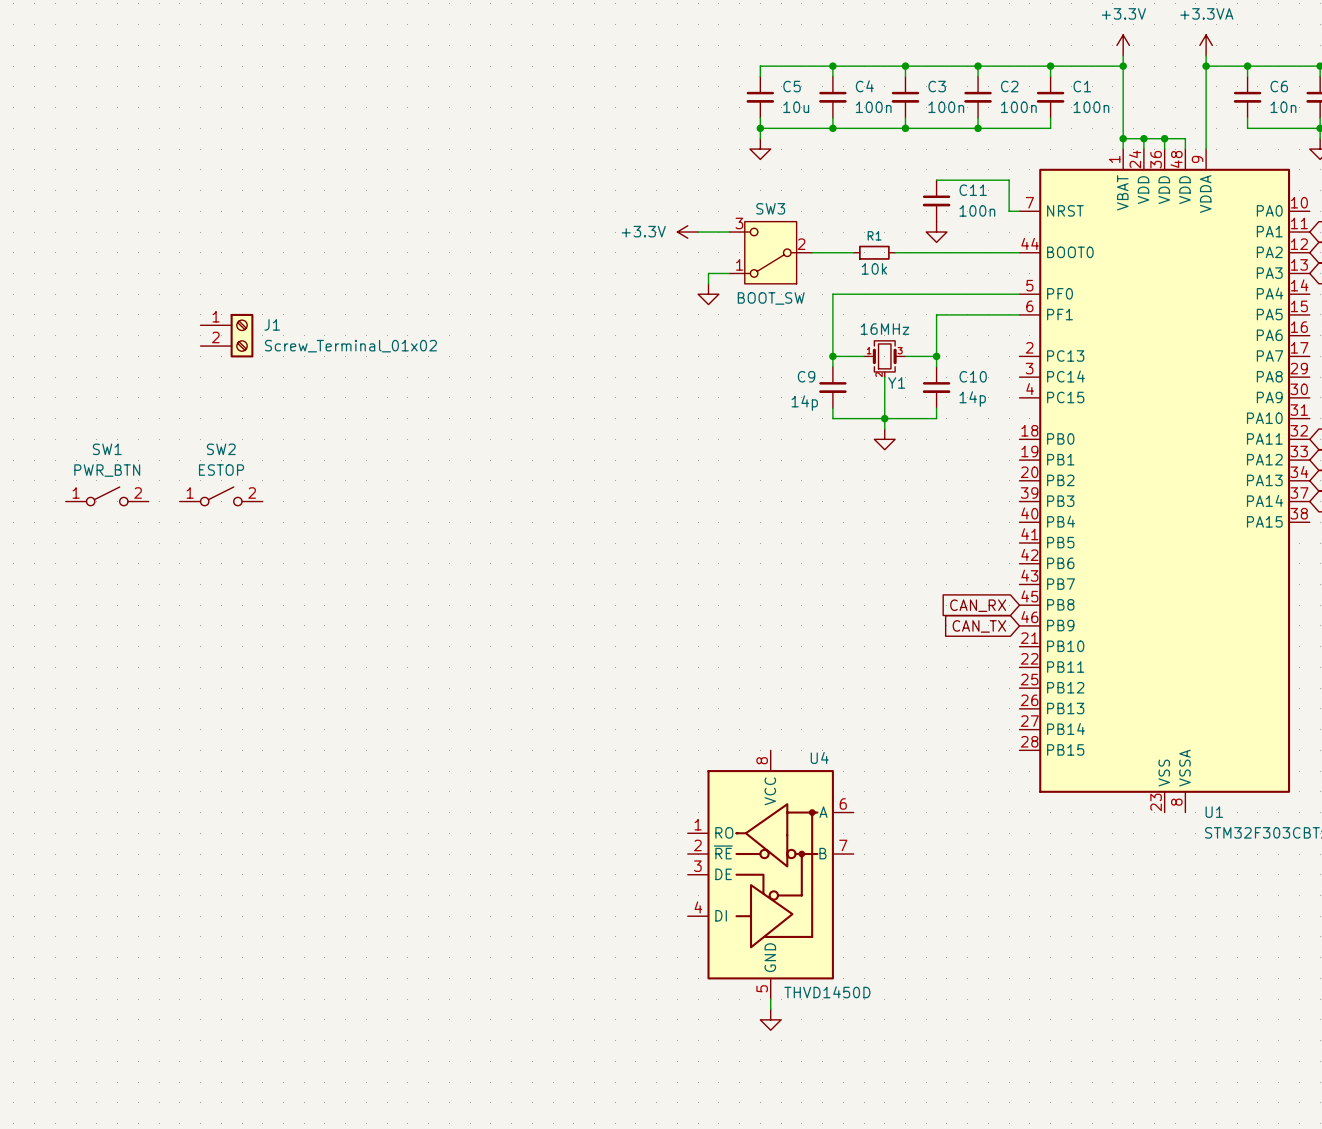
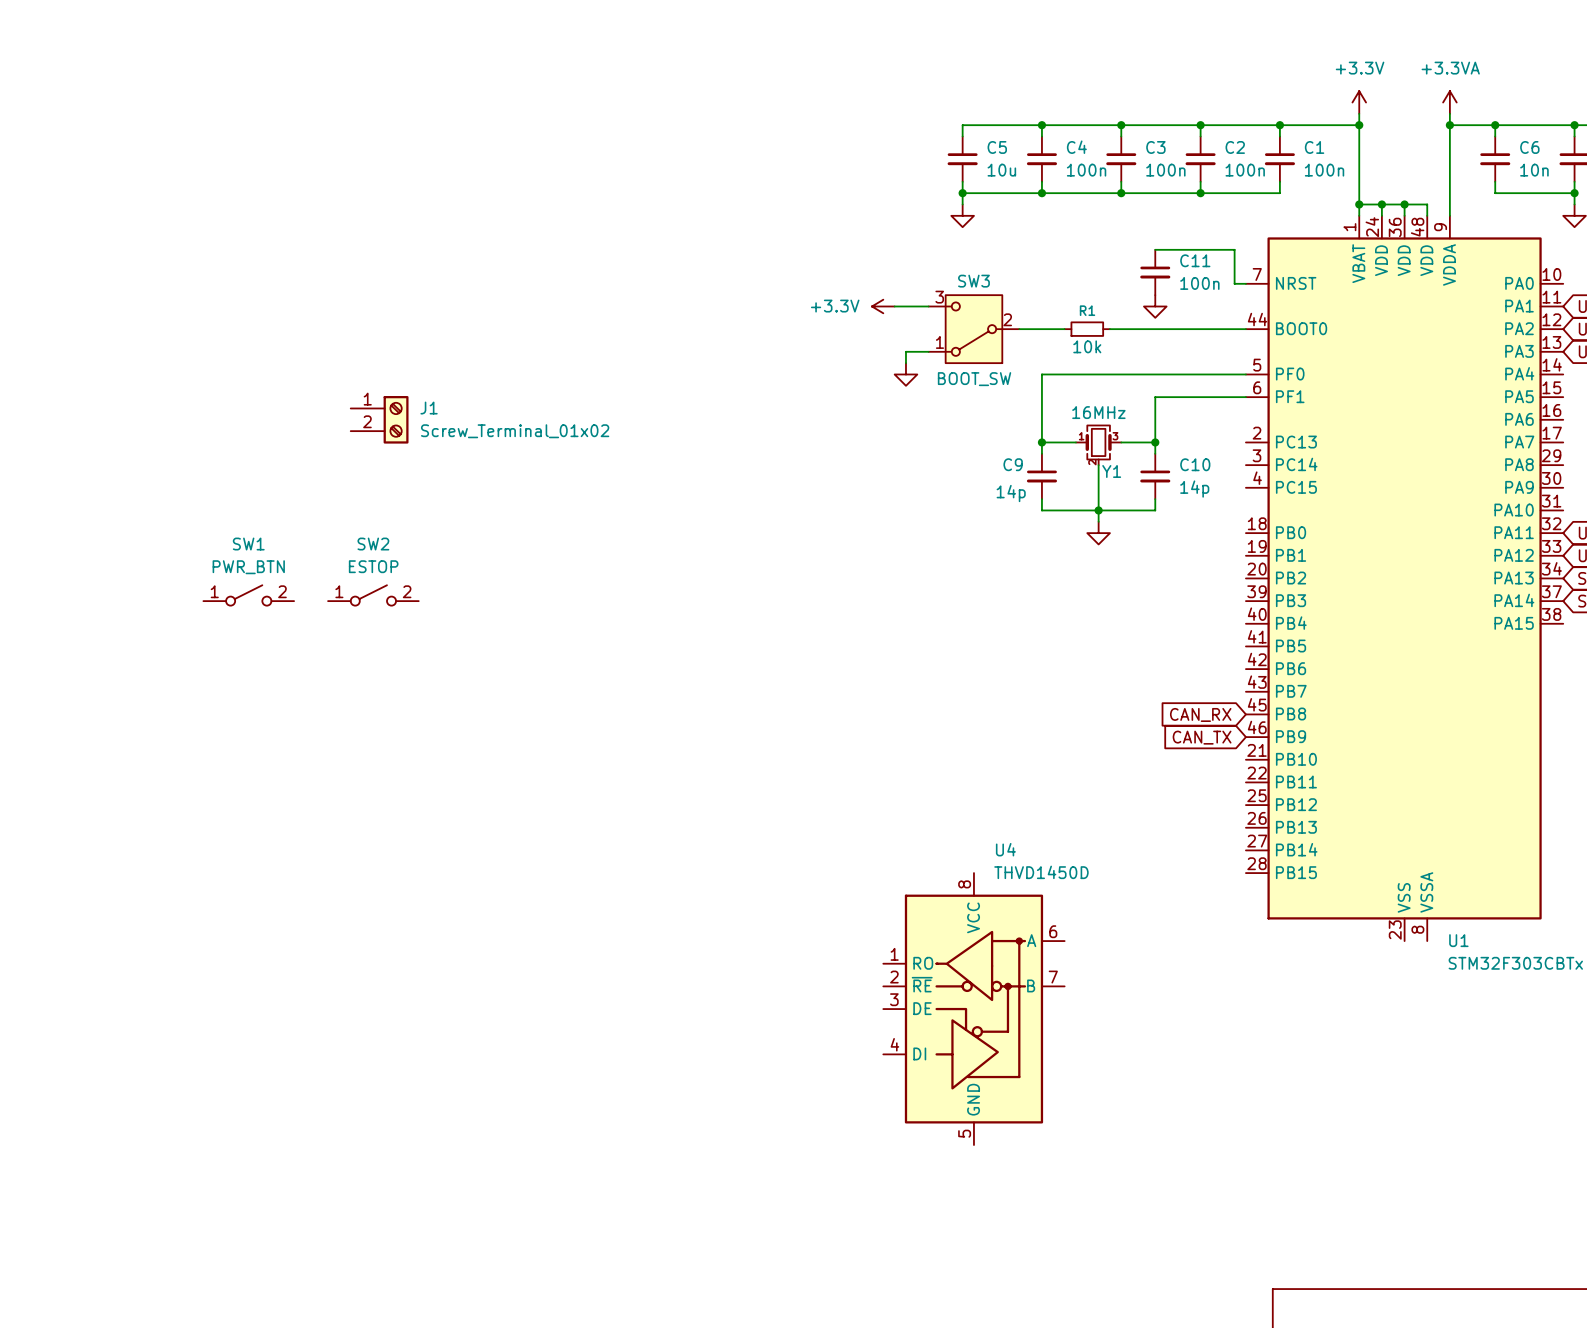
U4 name position: U4 (819, 757) -> U4 (1005, 849)
U4 value position: THVD1450D (827, 992) -> THVD1450D (1041, 872)
wire: (770, 999) (770, 1009) -> none
power symbol: (770, 1019) -> none

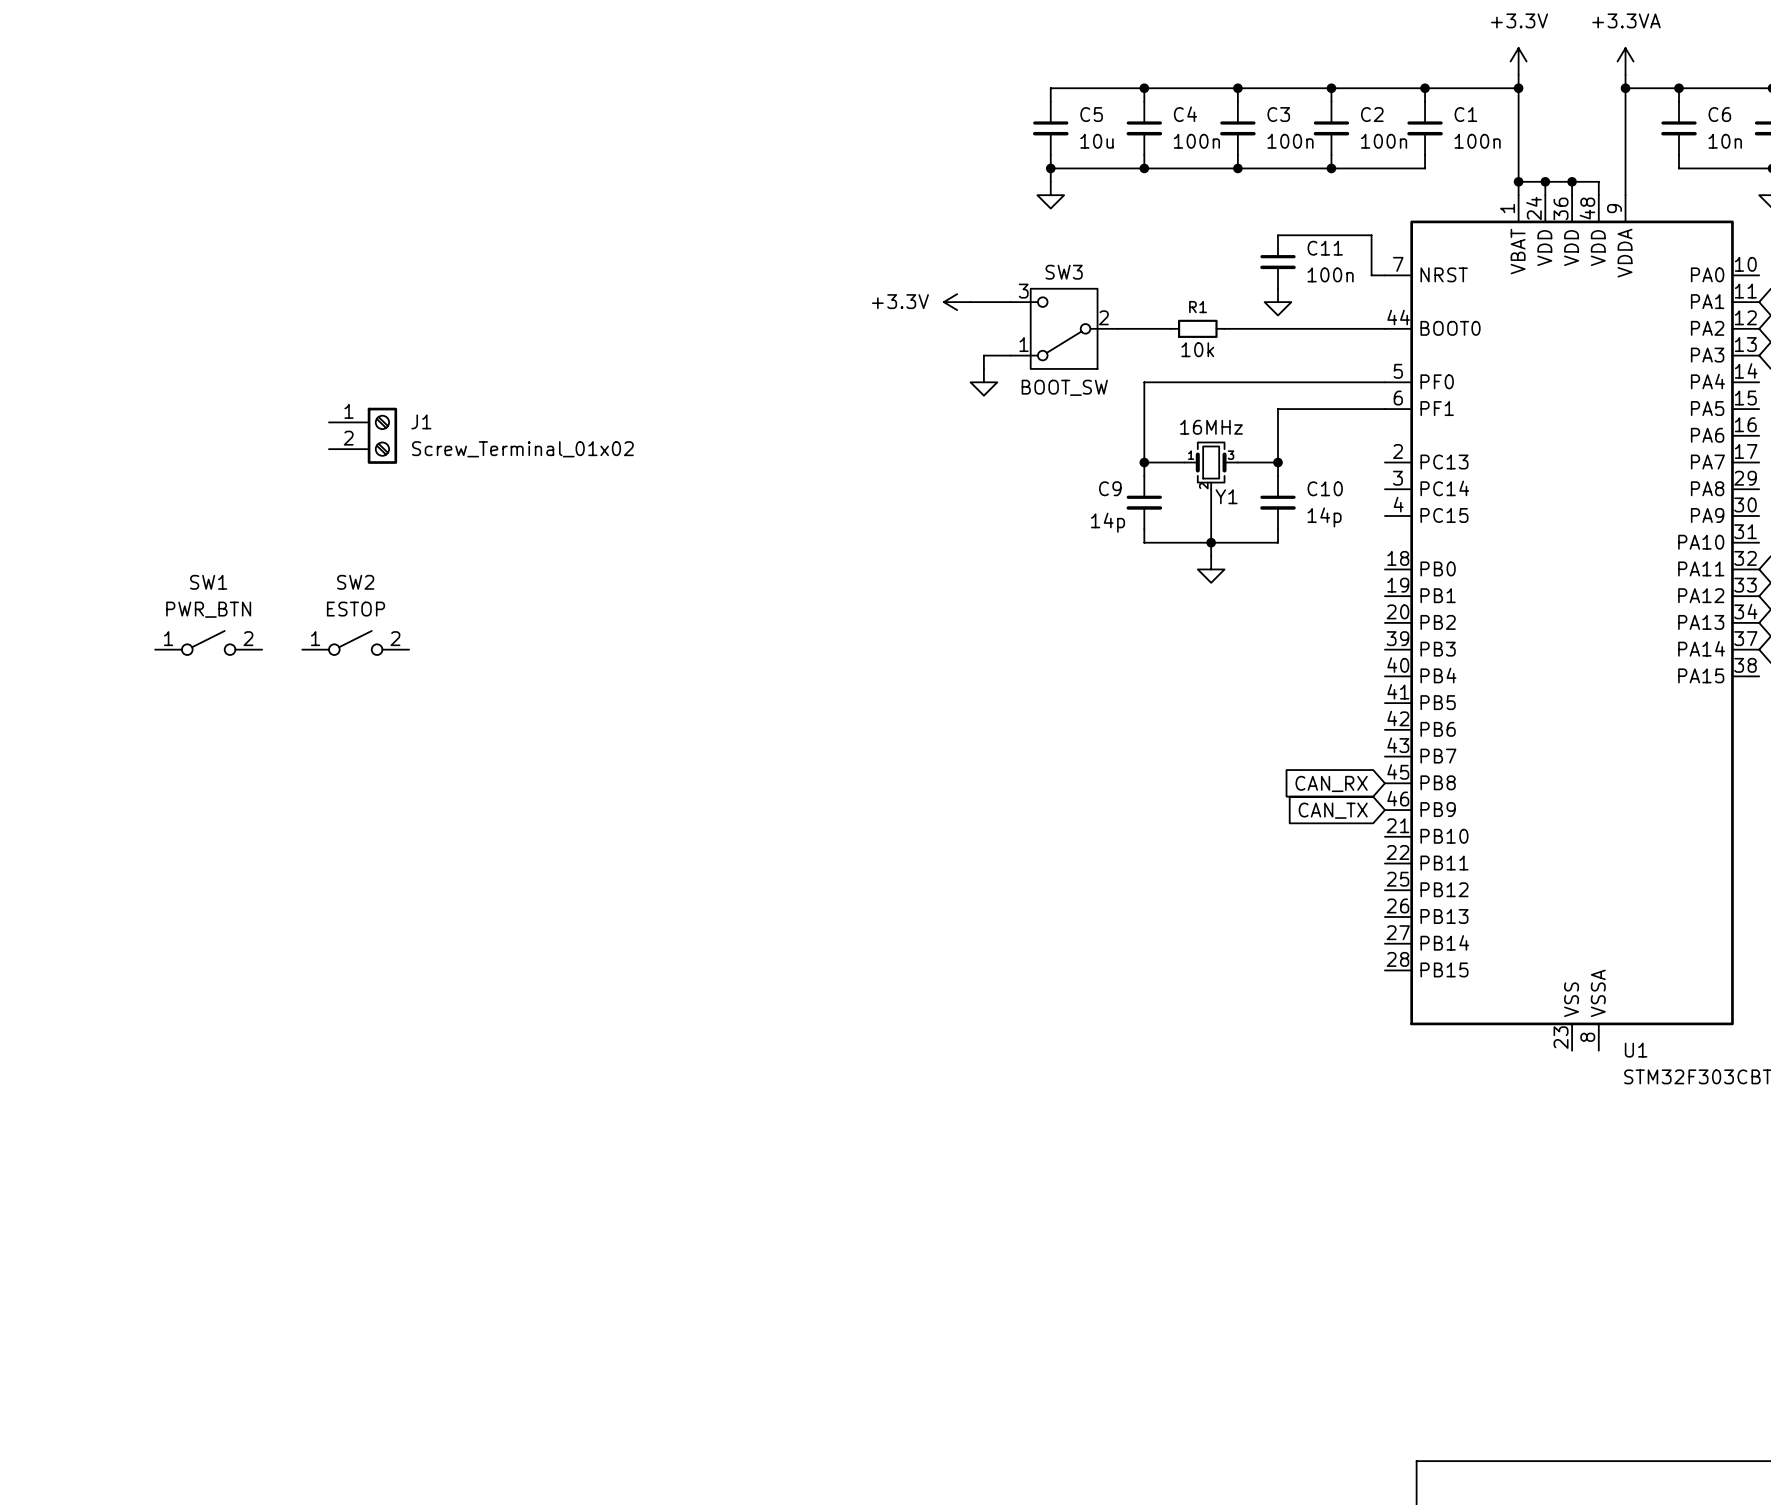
U4: THVD1450D (973, 1009) -> none

